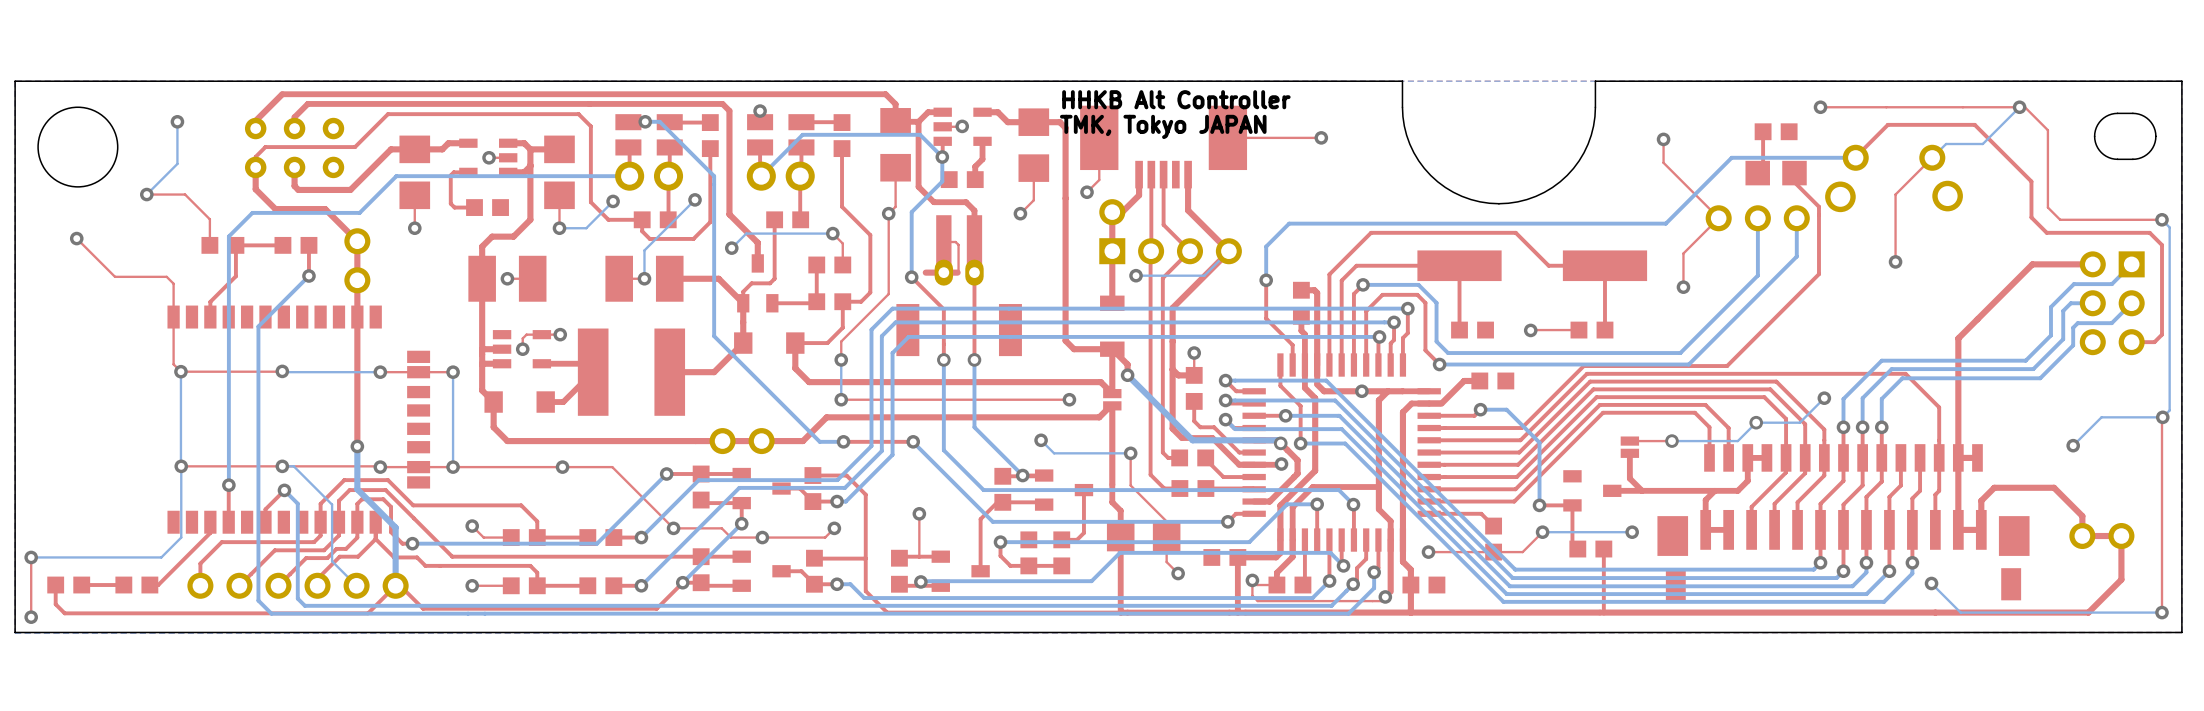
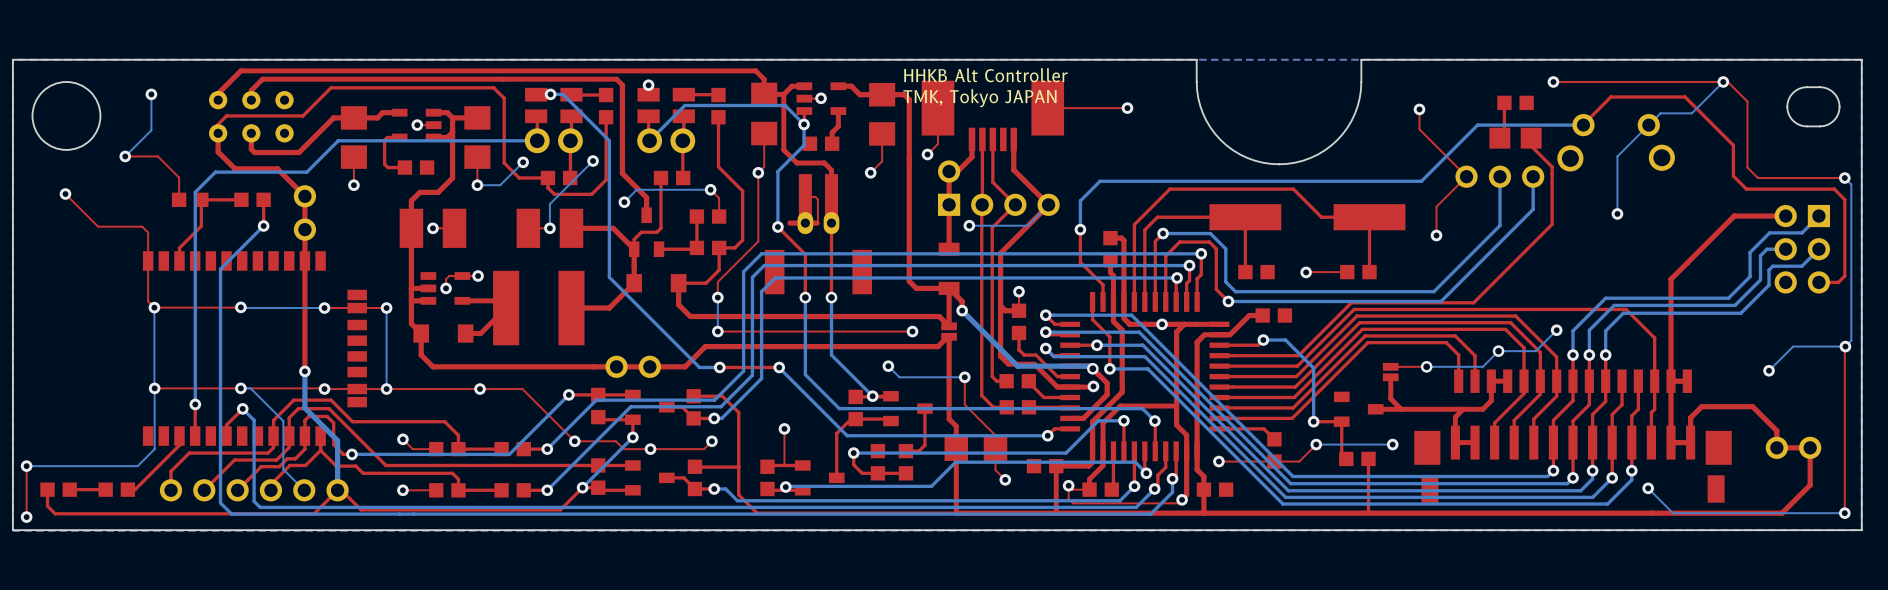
top track: (1932, 157) (1895, 194) (1895, 261) -> none
bottom track: none -> (1648, 125) (1617, 156) (1617, 213)

